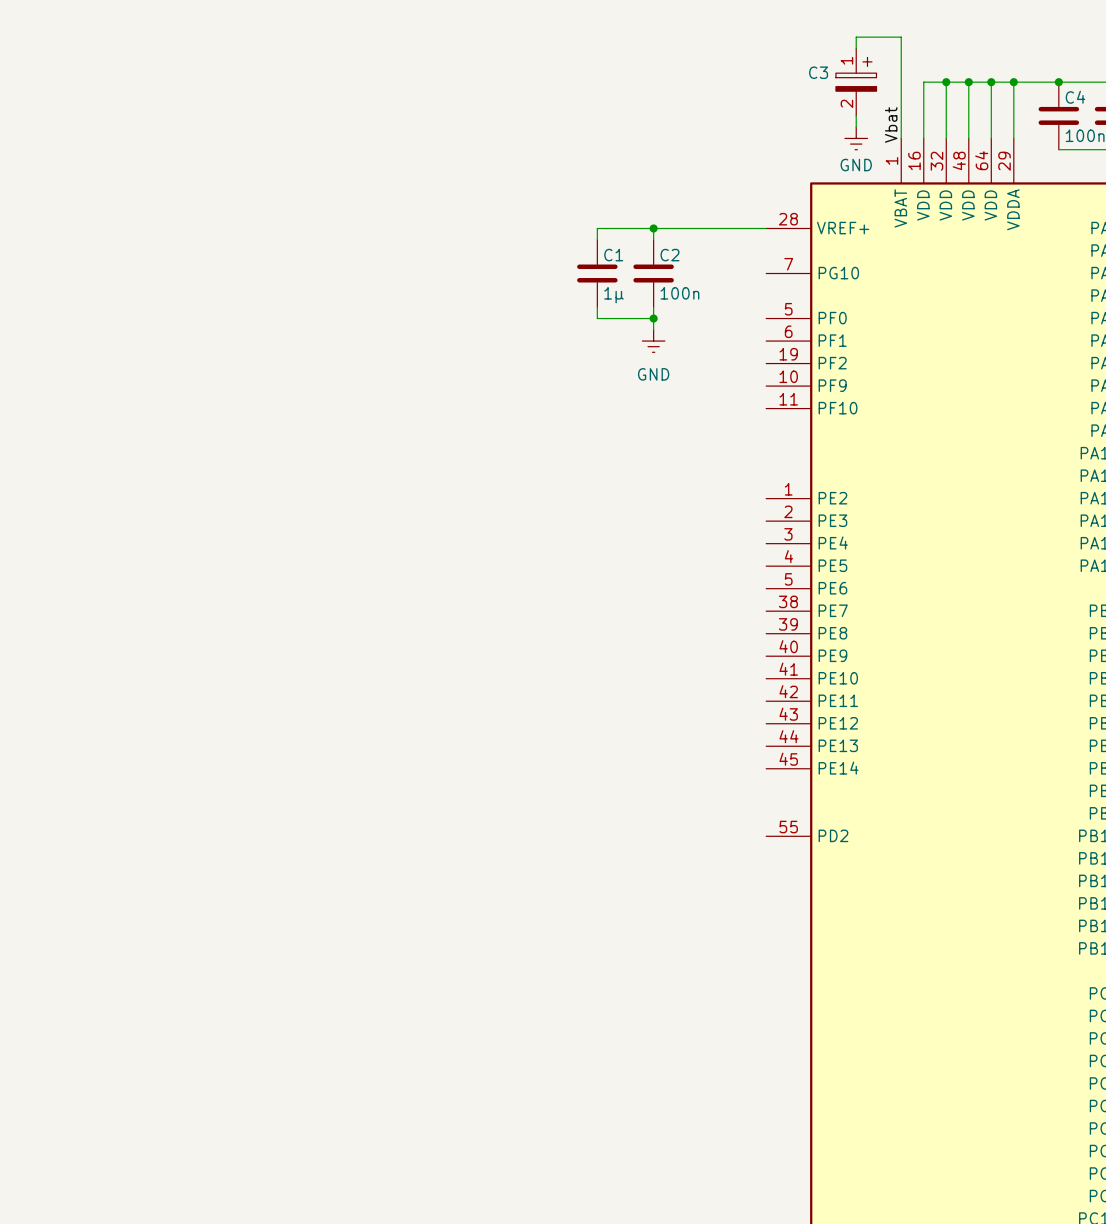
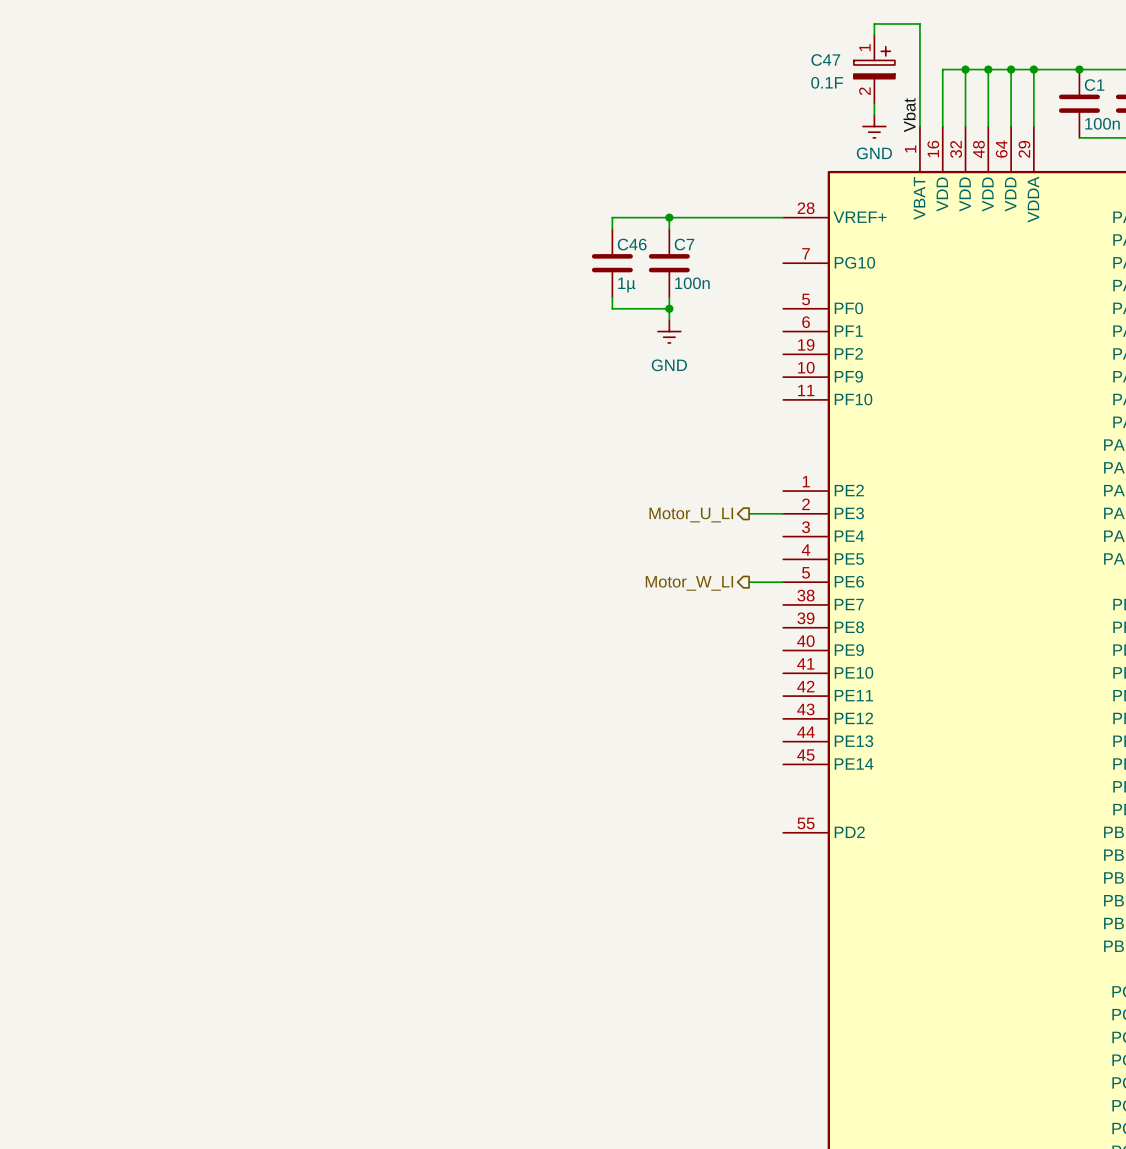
C3: (856, 82) -> none
C47: none -> 0.1F (874, 69)
C4 name: C4 (1075, 97) -> C1 (1094, 85)
C1 name: C1 (613, 255) -> C46 (632, 244)
C2 name: C2 (670, 255) -> C7 (684, 244)
hierarchical label: none -> Motor_U_LI (691, 515)
wire: none -> (749, 513) (783, 513)
hierarchical label: none -> Motor_W_LI (689, 583)
wire: none -> (749, 582) (783, 582)

